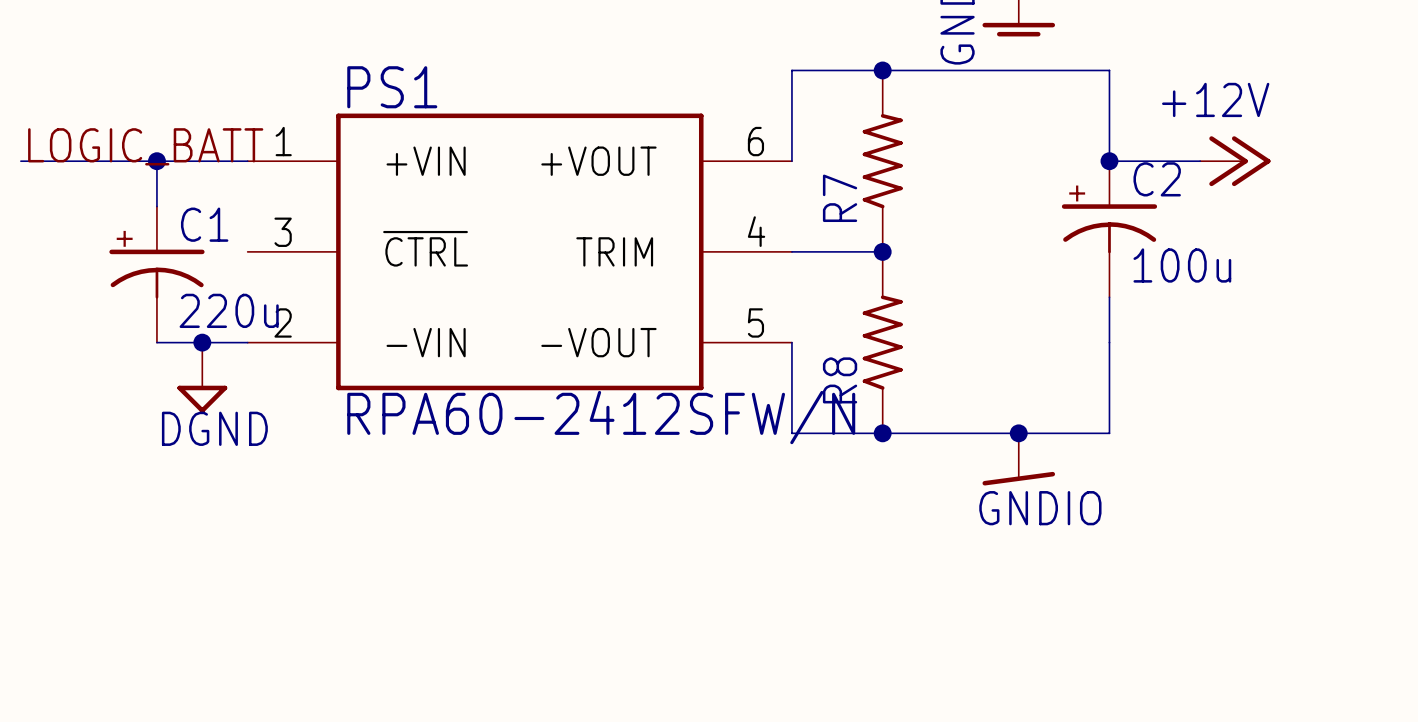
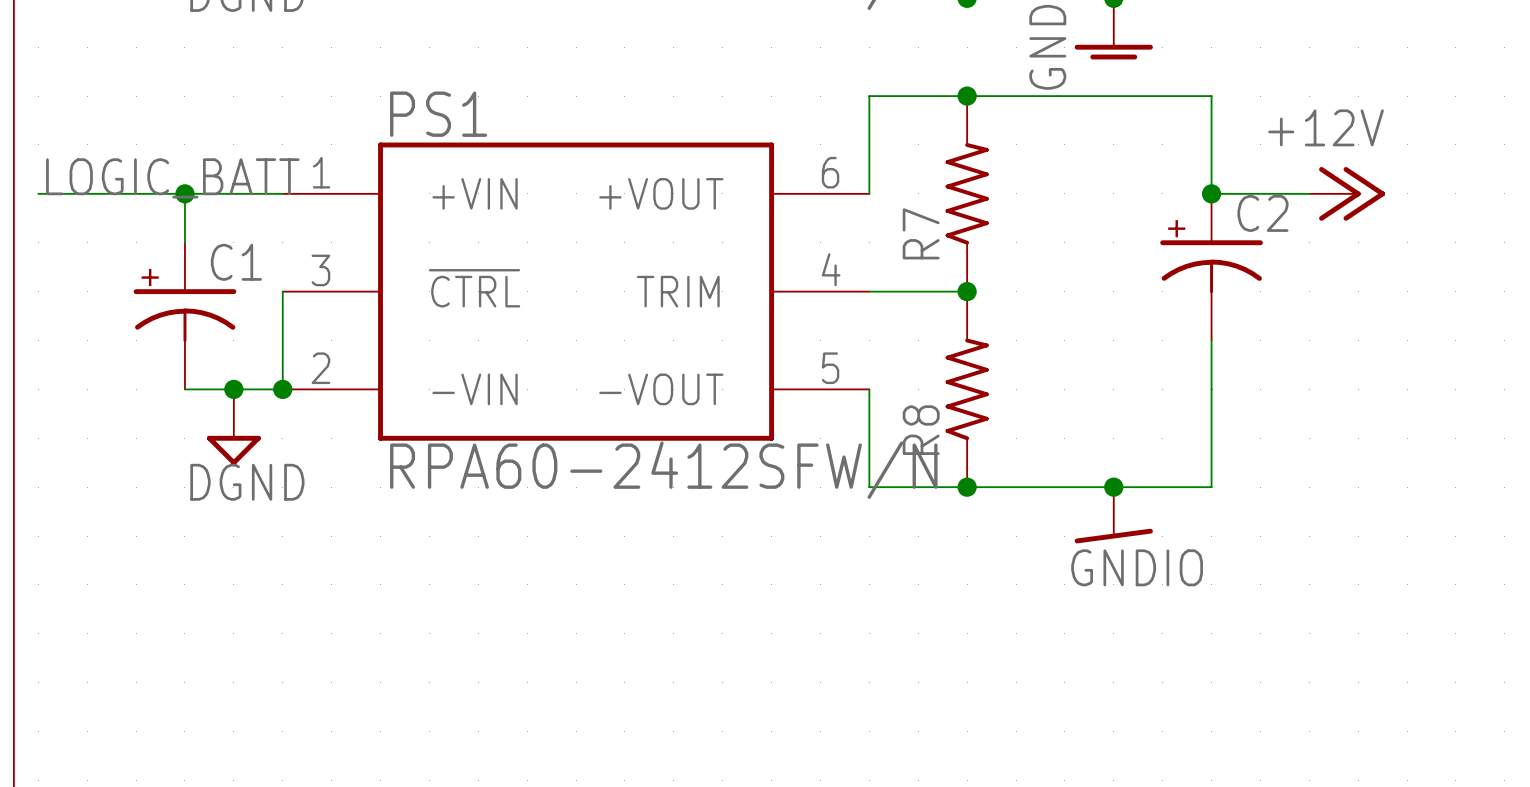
wire: none -> (282, 291) (282, 389)
C2 value: 100u (1182, 265) -> none
C1 value: 220u (229, 310) -> none
junction: none -> (282, 389)

